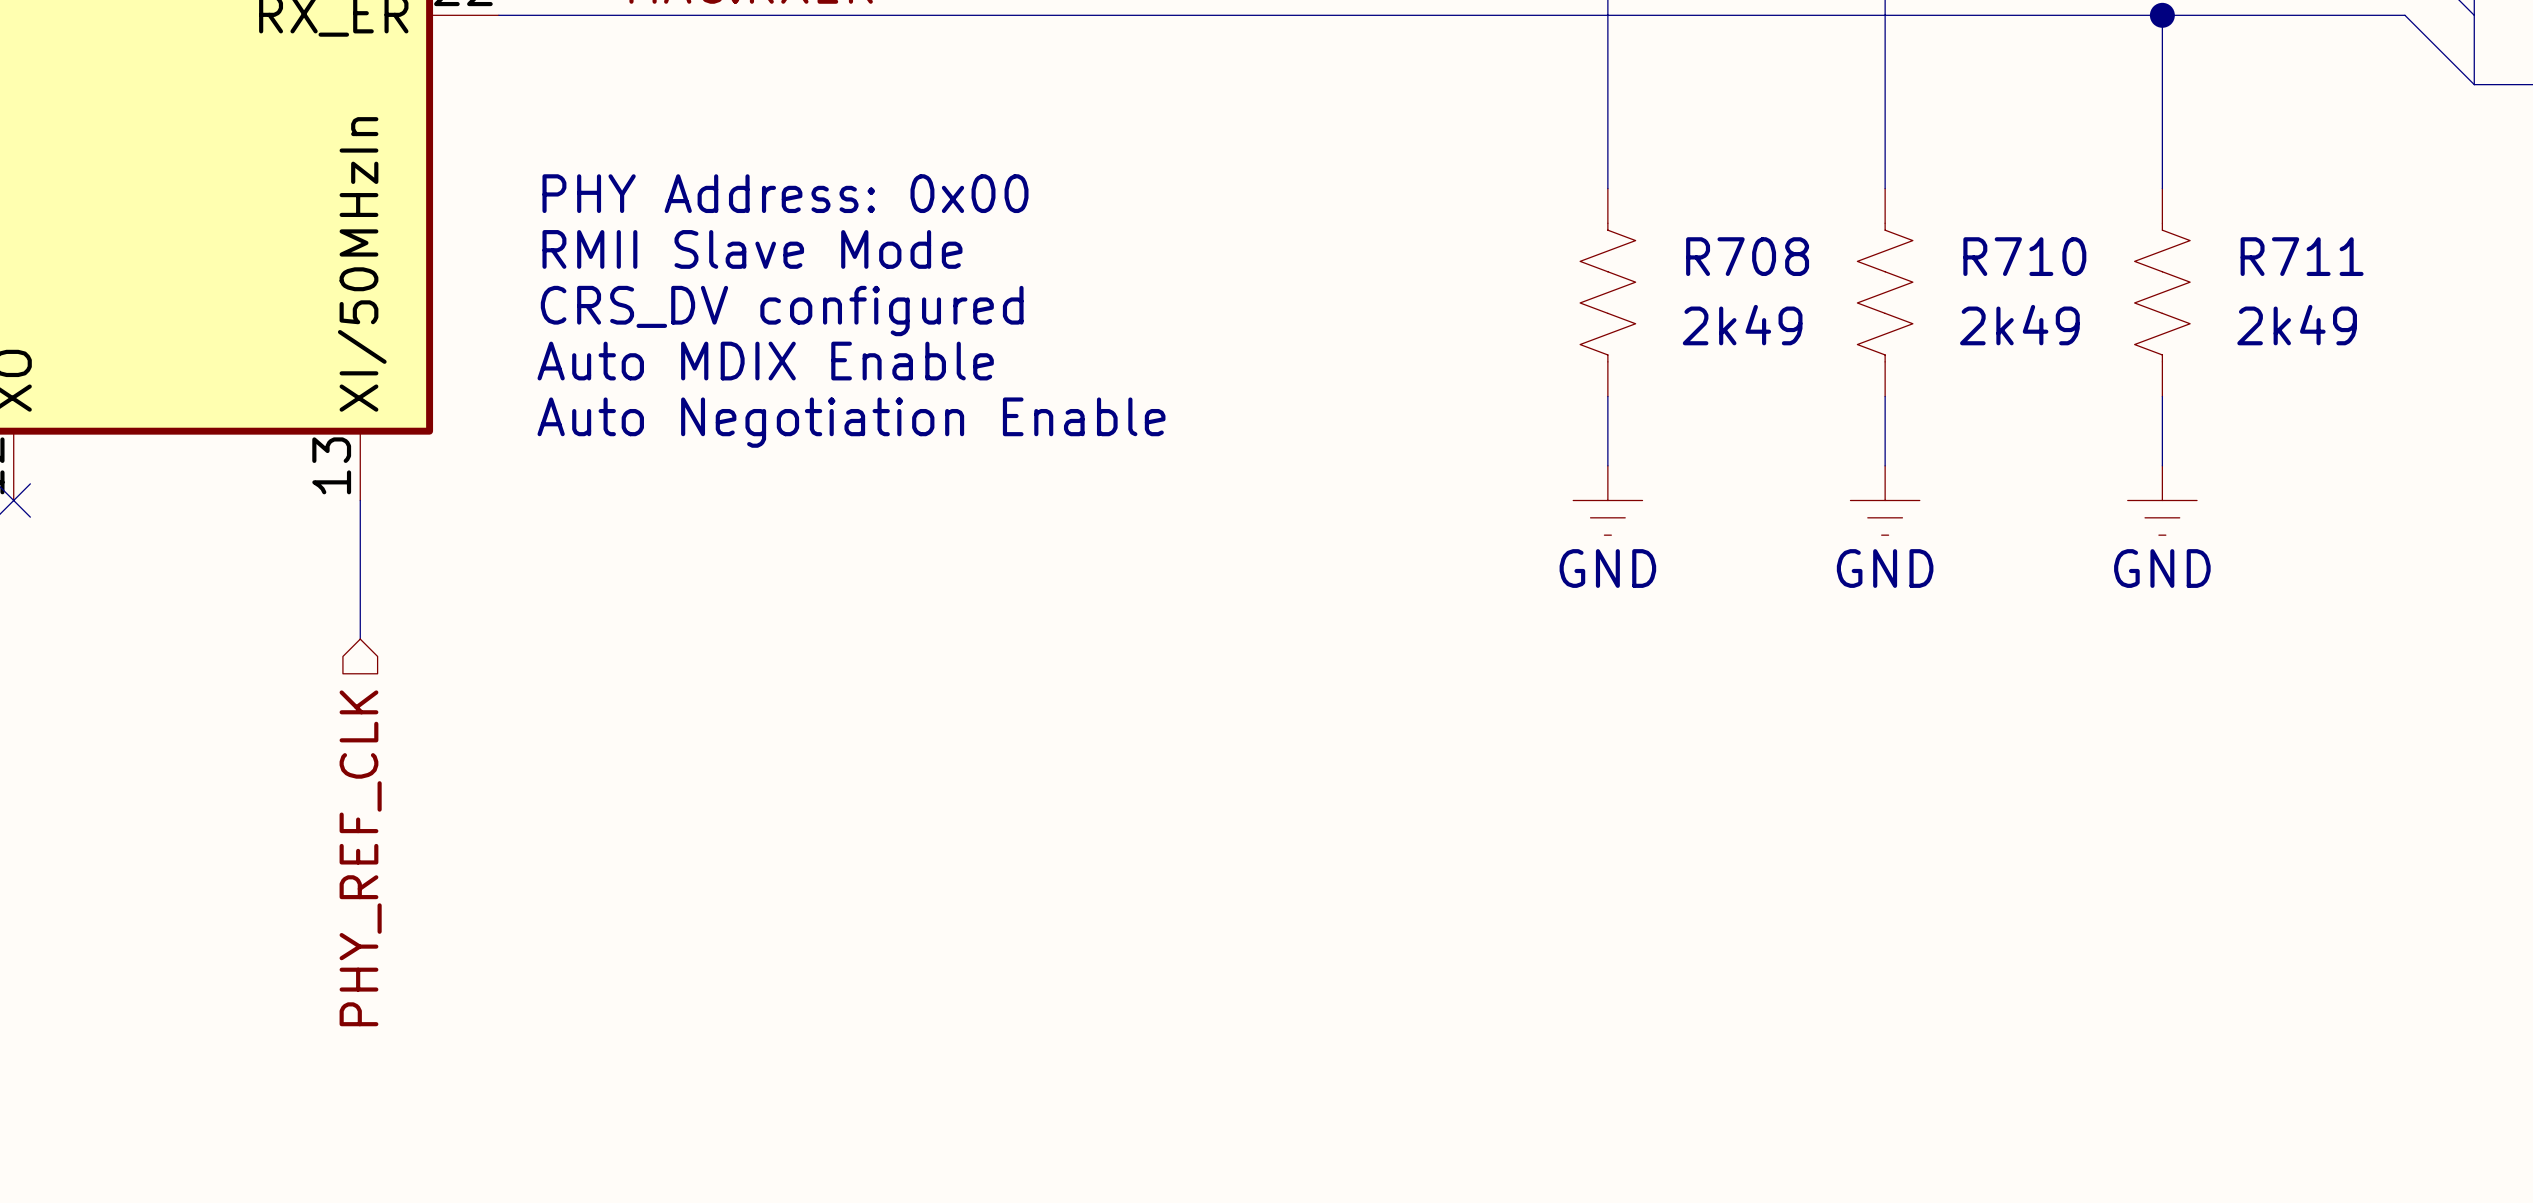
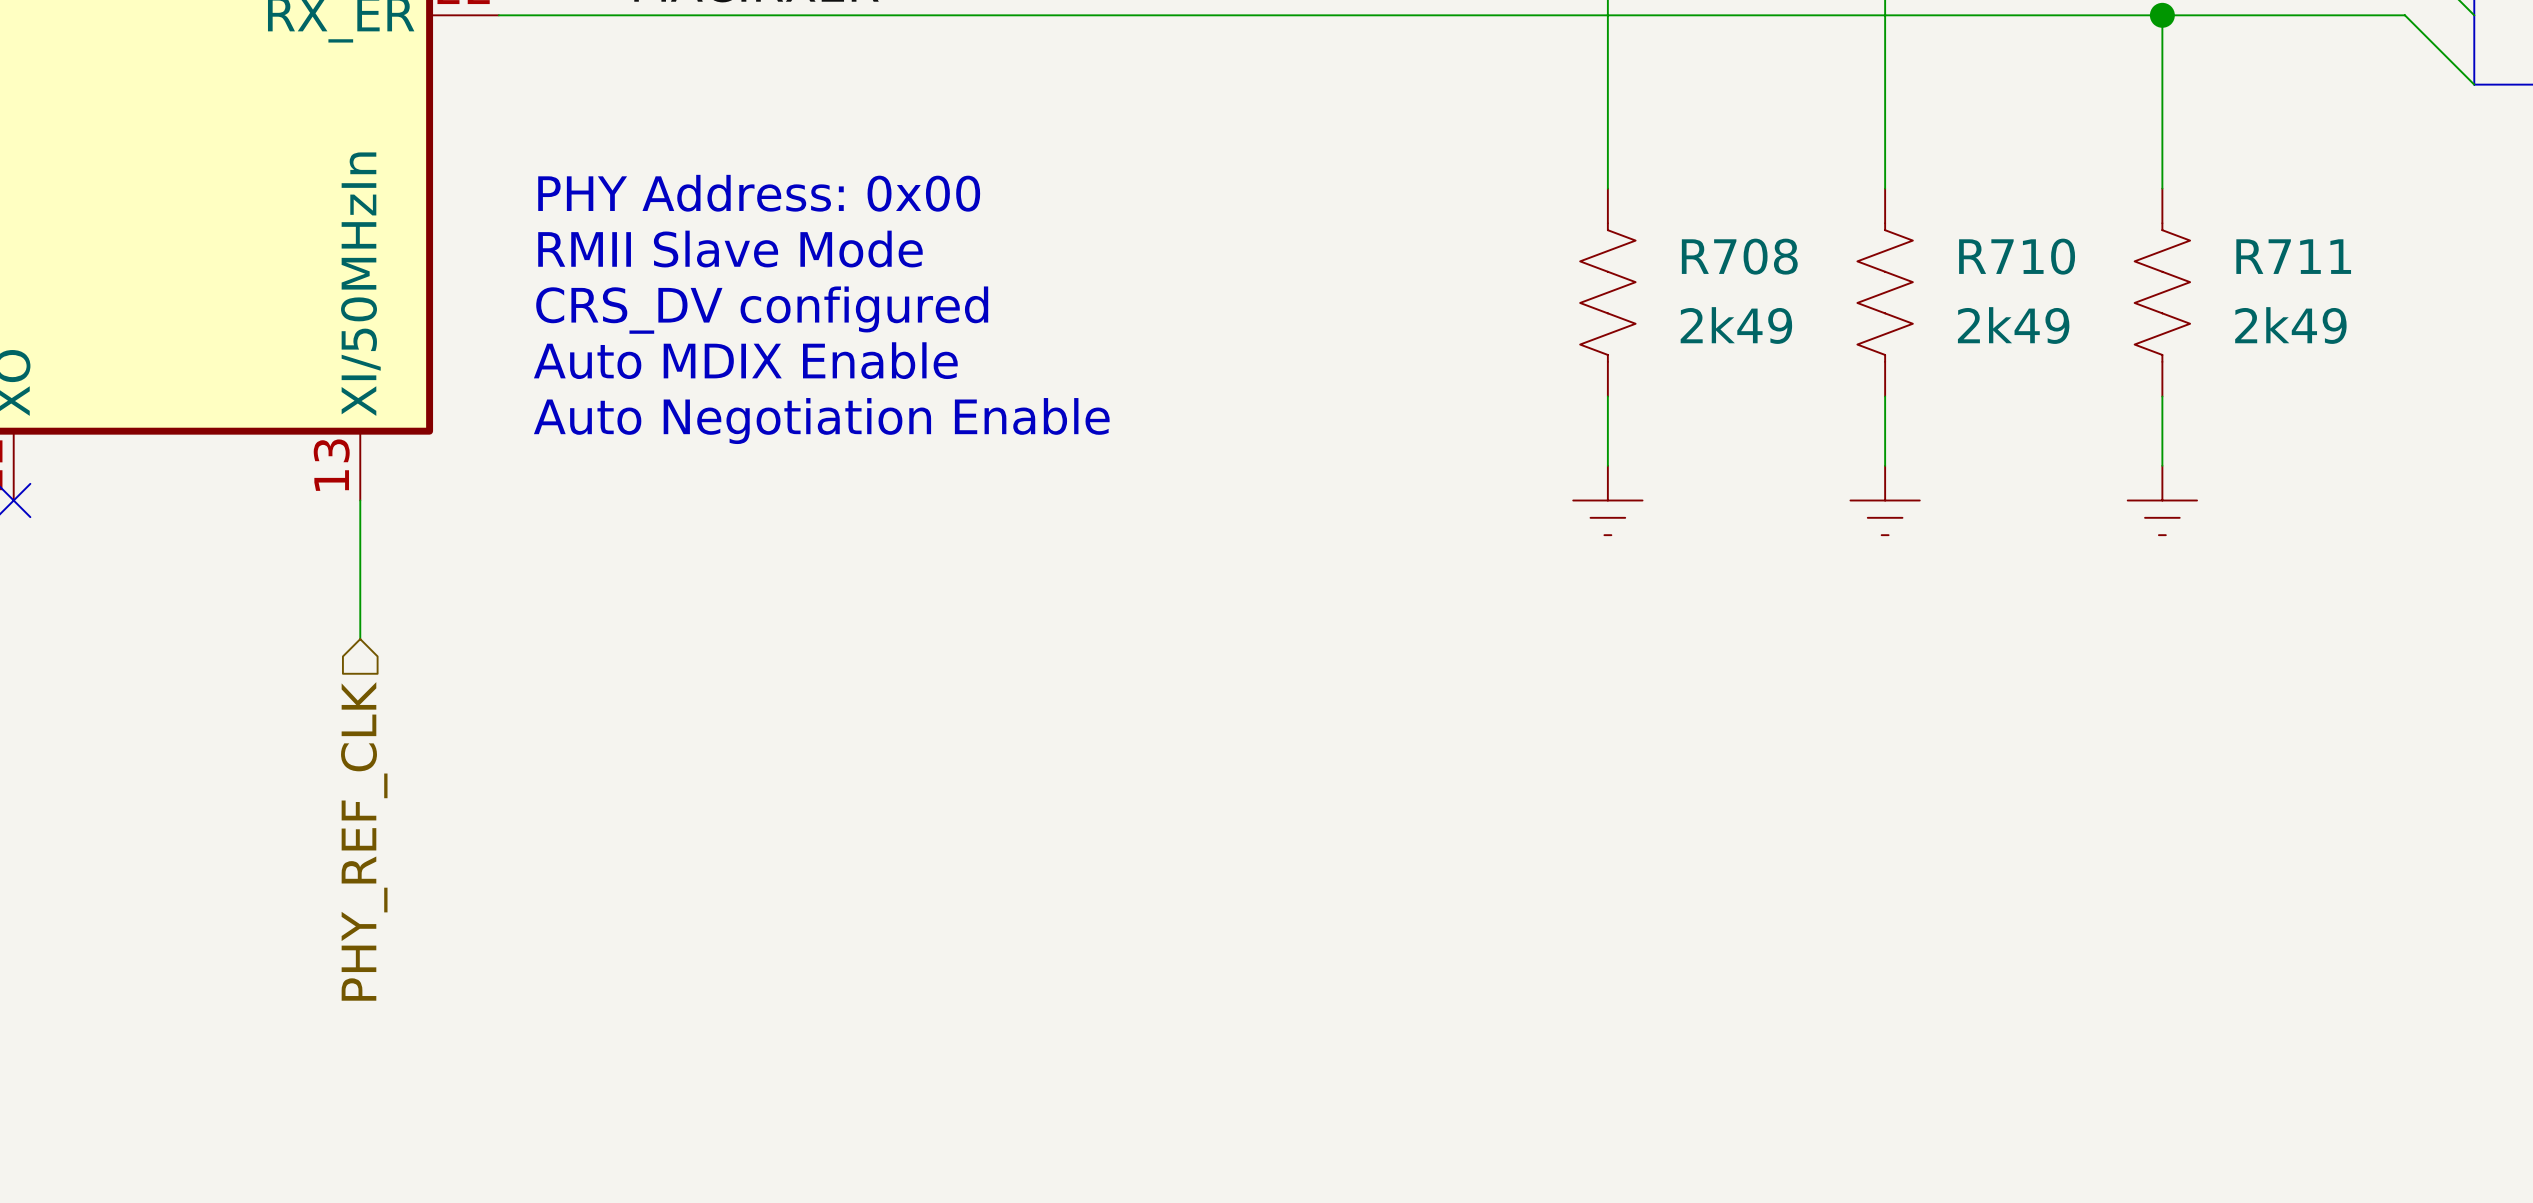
power symbol text: GND (1607, 568) -> none
power symbol text: GND (1885, 568) -> none
power symbol text: GND (2162, 568) -> none

